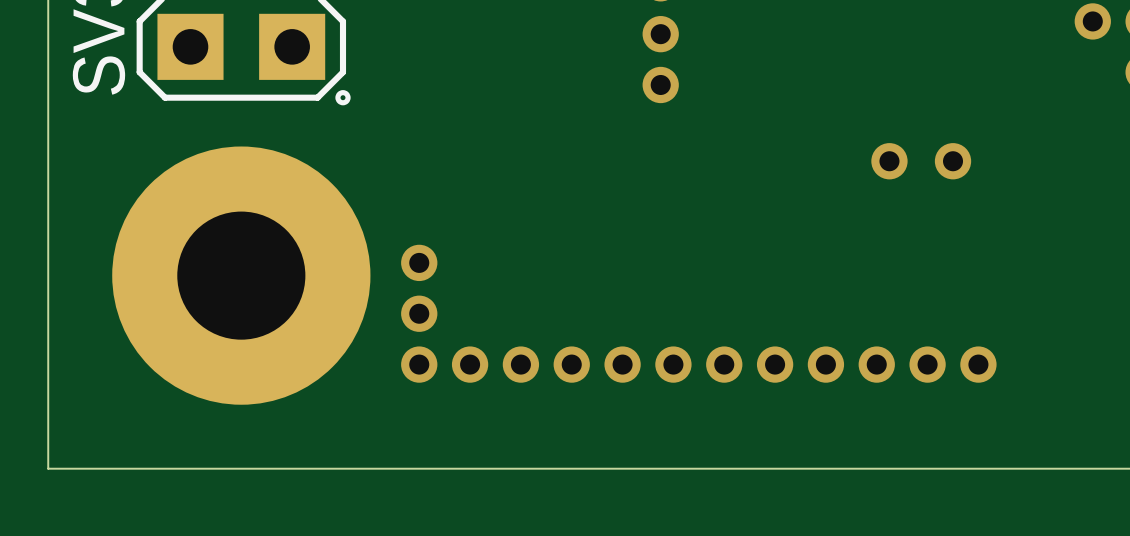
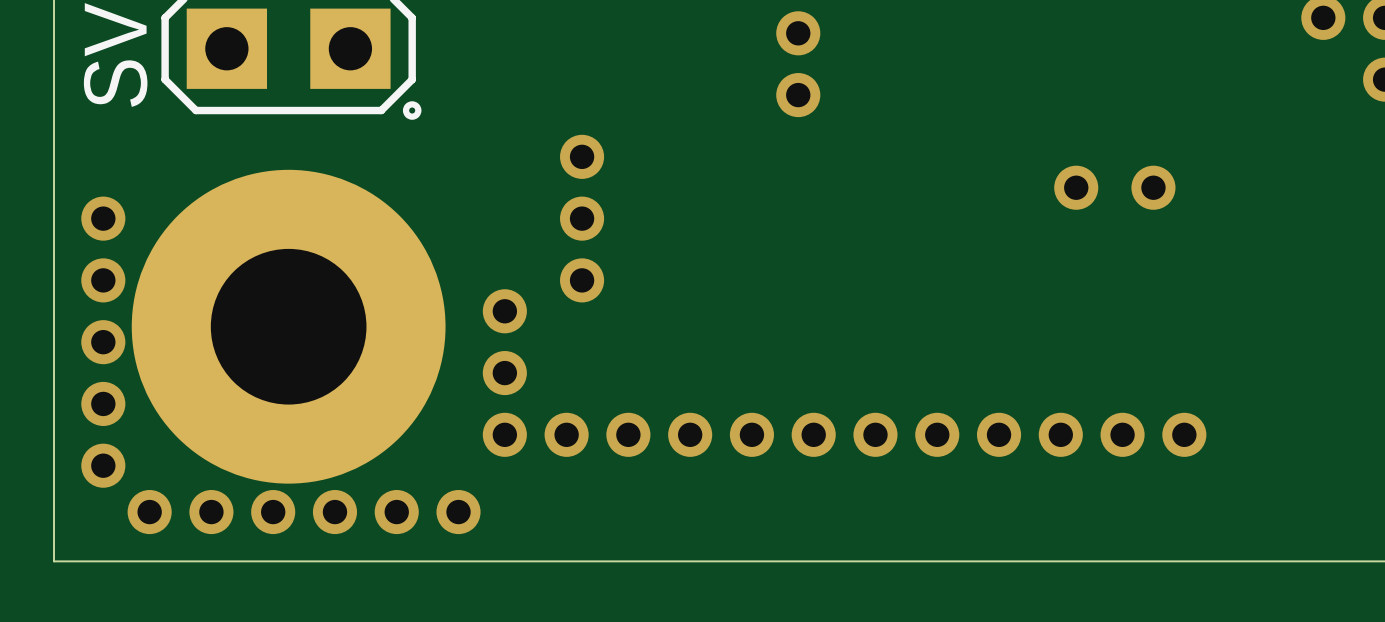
via: none -> (582, 156)
via: none -> (103, 218)
via: none -> (582, 218)
via: none -> (103, 280)
via: none -> (582, 280)
via: none -> (103, 342)
via: none -> (103, 403)
via: none -> (103, 465)
via: none -> (149, 512)
via: none -> (211, 512)
via: none -> (273, 512)
via: none -> (334, 512)
via: none -> (396, 512)
via: none -> (458, 512)

